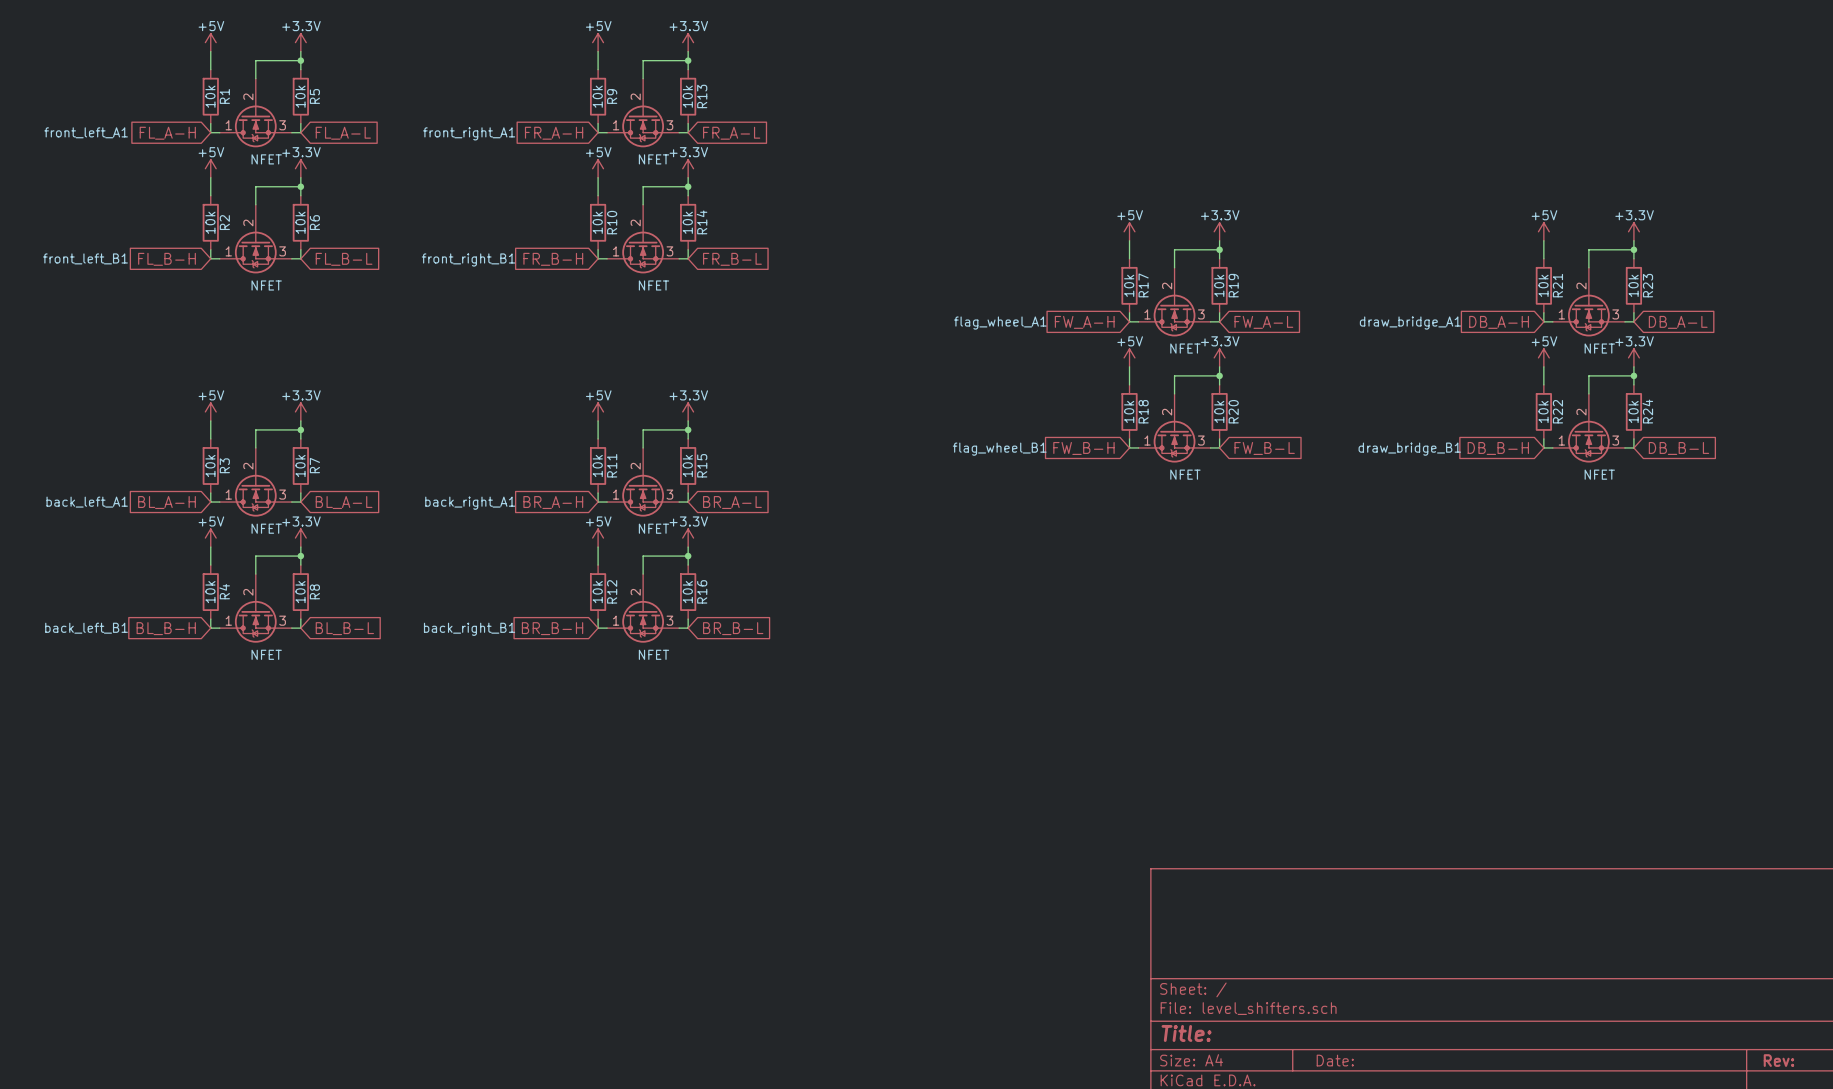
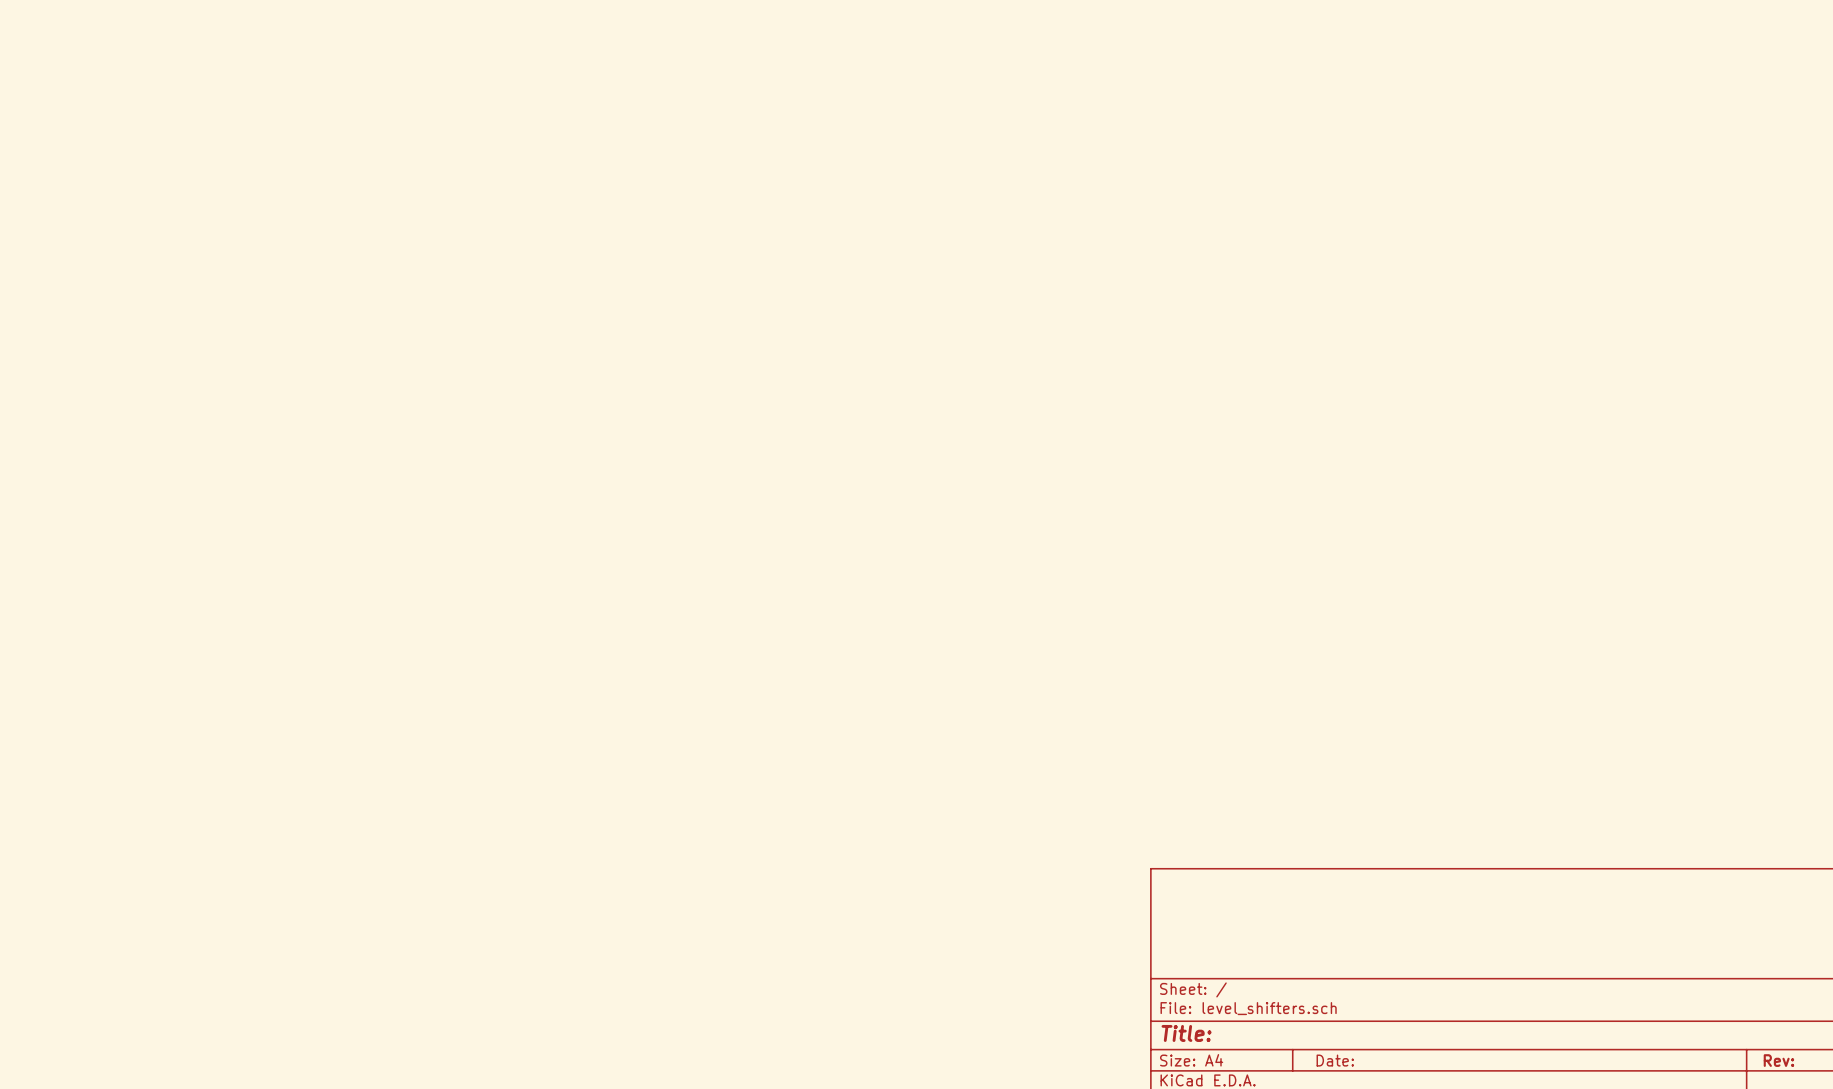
power symbol: +5V (210, 42) -> none
power symbol: +3.3V (300, 42) -> none
power symbol: +5V (598, 42) -> none
power symbol: +3.3V (688, 42) -> none
wire: (210, 51) (210, 69) -> none
wire: (300, 51) (300, 69) -> none
wire: (598, 51) (598, 69) -> none
wire: (688, 51) (688, 69) -> none
wire: (300, 60) (255, 60) (255, 78) -> none
junction: (300, 60) -> none
wire: (688, 60) (643, 60) (643, 78) -> none
junction: (688, 60) -> none
R1: 10k (210, 96) -> none
R5: 10k (300, 96) -> none
R9: 10k (598, 96) -> none
R13: 10k (688, 96) -> none
front_left_A1: NFET (255, 112) -> none
front_right_A1: NFET (643, 112) -> none
wire: (210, 123) (210, 132) (219, 132) -> none
wire: (300, 123) (300, 132) (291, 132) -> none
wire: (598, 123) (598, 132) (607, 132) -> none
wire: (688, 123) (688, 132) (679, 132) -> none
global label: FL_A-H (167, 133) -> none
global label: FL_A-L (343, 133) -> none
global label: FR_A-H (554, 133) -> none
global label: FR_A-L (731, 133) -> none
power symbol: +5V (210, 168) -> none
power symbol: +3.3V (300, 168) -> none
power symbol: +5V (598, 168) -> none
power symbol: +3.3V (688, 168) -> none
wire: (210, 177) (210, 195) -> none
wire: (300, 177) (300, 195) -> none
wire: (598, 177) (598, 195) -> none
wire: (688, 177) (688, 195) -> none
wire: (300, 186) (255, 186) (255, 204) -> none
junction: (300, 186) -> none
wire: (688, 186) (643, 186) (643, 204) -> none
junction: (688, 186) -> none
R2: 10k (210, 222) -> none
R6: 10k (300, 222) -> none
R10: 10k (598, 222) -> none
R14: 10k (688, 222) -> none
power symbol: +5V (1129, 231) -> none
power symbol: +3.3V (1219, 231) -> none
power symbol: +5V (1543, 231) -> none
power symbol: +3.3V (1633, 231) -> none
front_left_B1: NFET (255, 239) -> none
front_right_B1: NFET (643, 239) -> none
wire: (1129, 240) (1129, 258) -> none
wire: (1219, 240) (1219, 258) -> none
wire: (1543, 240) (1543, 258) -> none
wire: (1633, 240) (1633, 258) -> none
wire: (210, 249) (210, 258) (219, 258) -> none
wire: (300, 249) (300, 258) (291, 258) -> none
wire: (598, 249) (598, 258) (607, 258) -> none
wire: (688, 249) (688, 258) (679, 258) -> none
wire: (1219, 249) (1174, 249) (1174, 267) -> none
junction: (1219, 249) -> none
wire: (1633, 249) (1588, 249) (1588, 267) -> none
junction: (1633, 249) -> none
global label: FL_B-H (167, 259) -> none
global label: FL_B-L (344, 259) -> none
global label: FR_B-H (553, 259) -> none
global label: FR_B-L (732, 259) -> none
R17: 10k (1129, 285) -> none
R19: 10k (1219, 285) -> none
R21: 10k (1543, 285) -> none
R23: 10k (1633, 285) -> none
flag_wheel_A1: NFET (1174, 302) -> none
draw_bridge_A1: NFET (1588, 302) -> none
wire: (1129, 312) (1129, 321) (1138, 321) -> none
wire: (1219, 312) (1219, 321) (1210, 321) -> none
wire: (1543, 312) (1543, 321) (1552, 321) -> none
wire: (1633, 312) (1633, 321) (1624, 321) -> none
global label: FW_A-H (1084, 322) -> none
global label: FW_A-L (1263, 322) -> none
global label: DB_A-H (1499, 322) -> none
global label: DB_A-L (1678, 322) -> none
power symbol: +5V (1129, 357) -> none
power symbol: +3.3V (1219, 357) -> none
power symbol: +5V (1543, 357) -> none
power symbol: +3.3V (1633, 357) -> none
wire: (1129, 366) (1129, 384) -> none
wire: (1219, 366) (1219, 384) -> none
wire: (1543, 366) (1543, 384) -> none
wire: (1633, 366) (1633, 384) -> none
wire: (1219, 375) (1174, 375) (1174, 393) -> none
junction: (1219, 375) -> none
wire: (1633, 375) (1588, 375) (1588, 393) -> none
junction: (1633, 375) -> none
power symbol: +5V (210, 411) -> none
power symbol: +3.3V (300, 411) -> none
power symbol: +5V (598, 411) -> none
power symbol: +3.3V (688, 411) -> none
R18: 10k (1129, 411) -> none
R20: 10k (1219, 411) -> none
R22: 10k (1543, 411) -> none
R24: 10k (1633, 411) -> none
wire: (210, 420) (210, 438) -> none
wire: (300, 420) (300, 438) -> none
wire: (598, 420) (598, 438) -> none
wire: (688, 420) (688, 438) -> none
flag_wheel_B1: NFET (1174, 428) -> none
draw_bridge_B1: NFET (1588, 428) -> none
wire: (300, 429) (255, 429) (255, 447) -> none
junction: (300, 429) -> none
wire: (688, 429) (643, 429) (643, 447) -> none
junction: (688, 429) -> none
wire: (1129, 438) (1129, 447) (1138, 447) -> none
wire: (1219, 438) (1219, 447) (1210, 447) -> none
wire: (1543, 438) (1543, 447) (1552, 447) -> none
wire: (1633, 438) (1633, 447) (1624, 447) -> none
global label: FW_B-H (1083, 448) -> none
global label: FW_B-L (1264, 448) -> none
global label: DB_B-H (1498, 448) -> none
global label: DB_B-L (1678, 448) -> none
R3: 10k (210, 465) -> none
R7: 10k (300, 465) -> none
R11: 10k (598, 465) -> none
R15: 10k (688, 465) -> none
back_left_A1: NFET (255, 482) -> none
back_right_A1: NFET (643, 482) -> none
wire: (210, 493) (210, 502) (219, 502) -> none
wire: (300, 493) (300, 502) (291, 502) -> none
wire: (598, 493) (598, 502) (607, 502) -> none
wire: (688, 493) (688, 502) (679, 502) -> none
global label: BL_A-H (167, 502) -> none
global label: BL_A-L (344, 502) -> none
global label: BR_A-H (553, 502) -> none
global label: BR_A-L (732, 502) -> none
power symbol: +5V (210, 538) -> none
power symbol: +3.3V (300, 538) -> none
power symbol: +5V (598, 538) -> none
power symbol: +3.3V (688, 538) -> none
wire: (210, 547) (210, 565) -> none
wire: (300, 547) (300, 565) -> none
wire: (598, 547) (598, 565) -> none
wire: (688, 547) (688, 565) -> none
wire: (300, 556) (255, 556) (255, 574) -> none
junction: (300, 556) -> none
wire: (688, 556) (643, 556) (643, 574) -> none
junction: (688, 556) -> none
R4: 10k (210, 592) -> none
R8: 10k (300, 592) -> none
R12: 10k (598, 592) -> none
R16: 10k (688, 592) -> none
back_left_B1: NFET (255, 608) -> none
back_right_B1: NFET (643, 608) -> none
wire: (210, 619) (210, 628) (219, 628) -> none
wire: (300, 619) (300, 628) (291, 628) -> none
wire: (598, 619) (598, 628) (607, 628) -> none
wire: (688, 619) (688, 628) (679, 628) -> none
global label: BL_B-H (166, 628) -> none
global label: BL_B-L (344, 628) -> none
global label: BR_B-H (552, 628) -> none
global label: BR_B-L (733, 628) -> none

